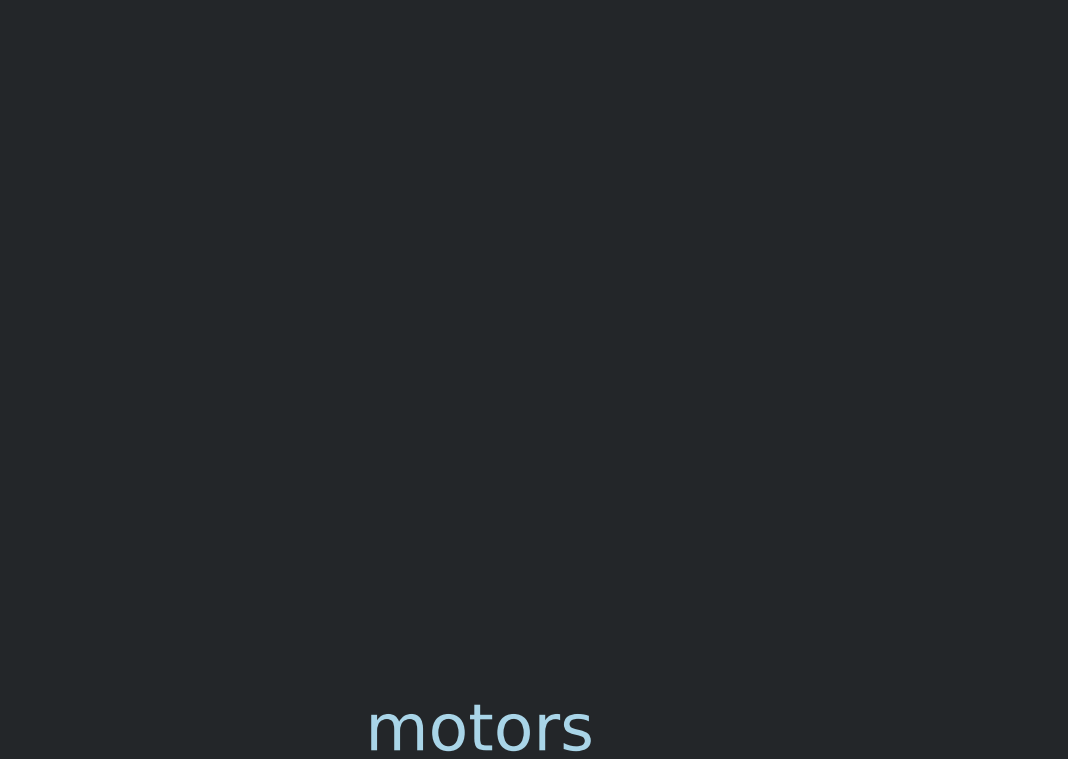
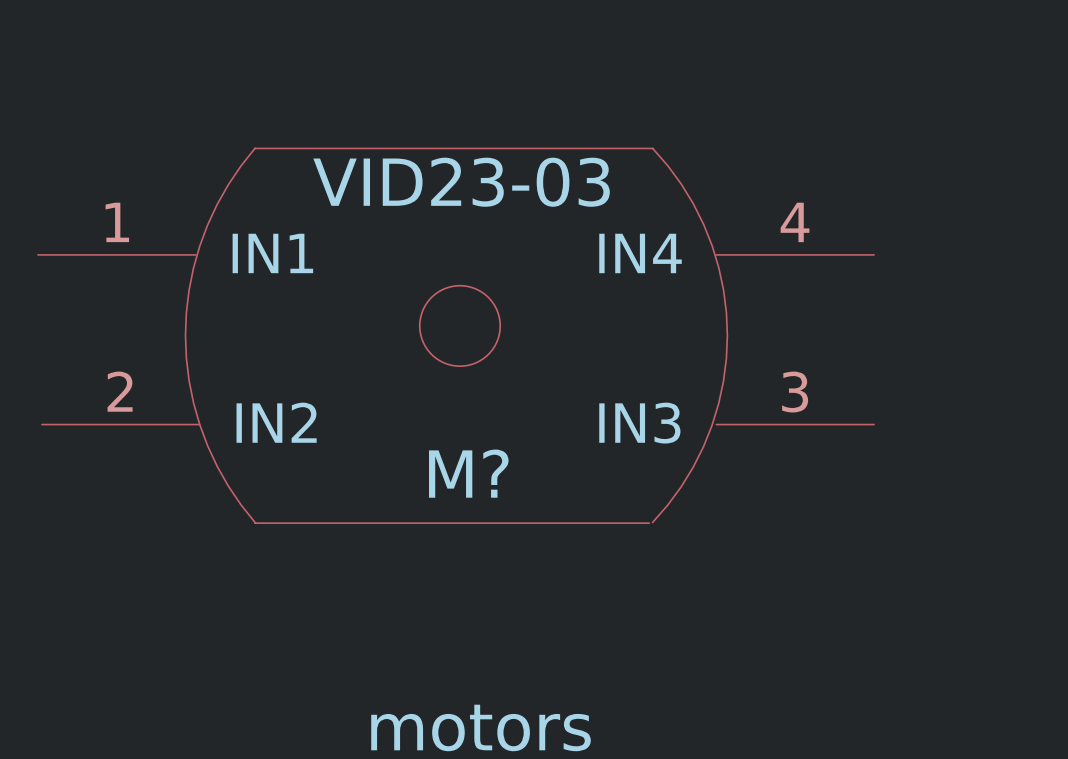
M?: none -> VID23-03 (456, 335)

